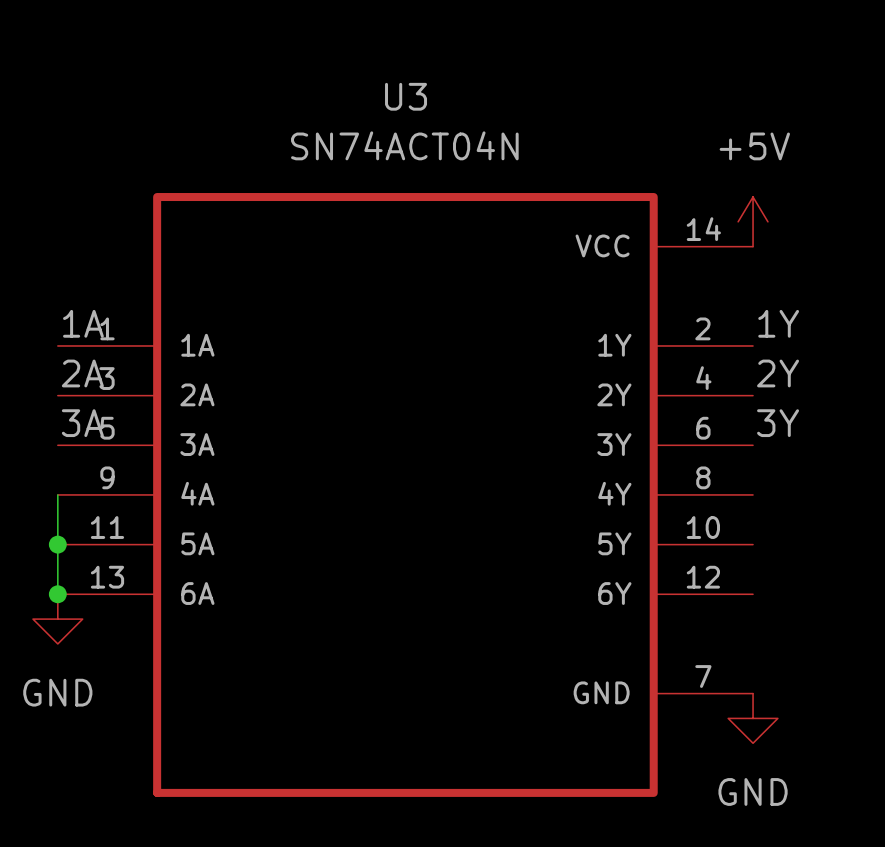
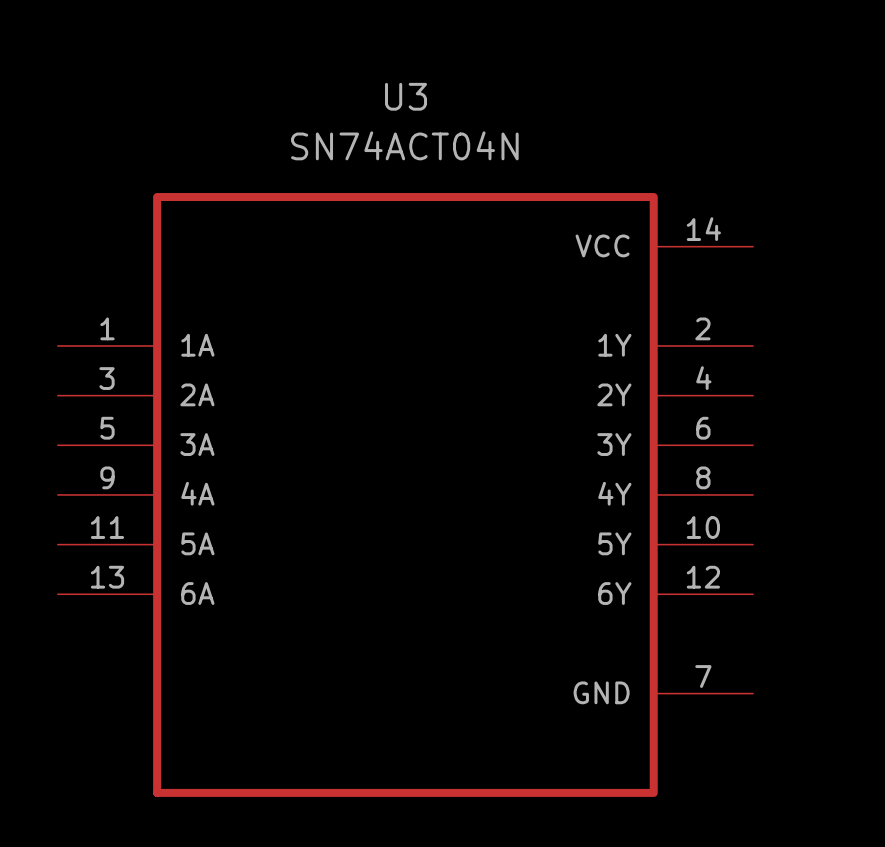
power symbol: +5V (753, 221) -> none
label: 1A (83, 323) -> none
label: 1Y (778, 323) -> none
label: 2A (82, 373) -> none
label: 2Y (778, 373) -> none
label: 3A (82, 423) -> none
label: 3Y (778, 423) -> none
wire: (57, 494) (57, 594) -> none
junction: (57, 544) -> none
junction: (57, 594) -> none
power symbol: GND (57, 619) -> none
power symbol: GND (753, 718) -> none

